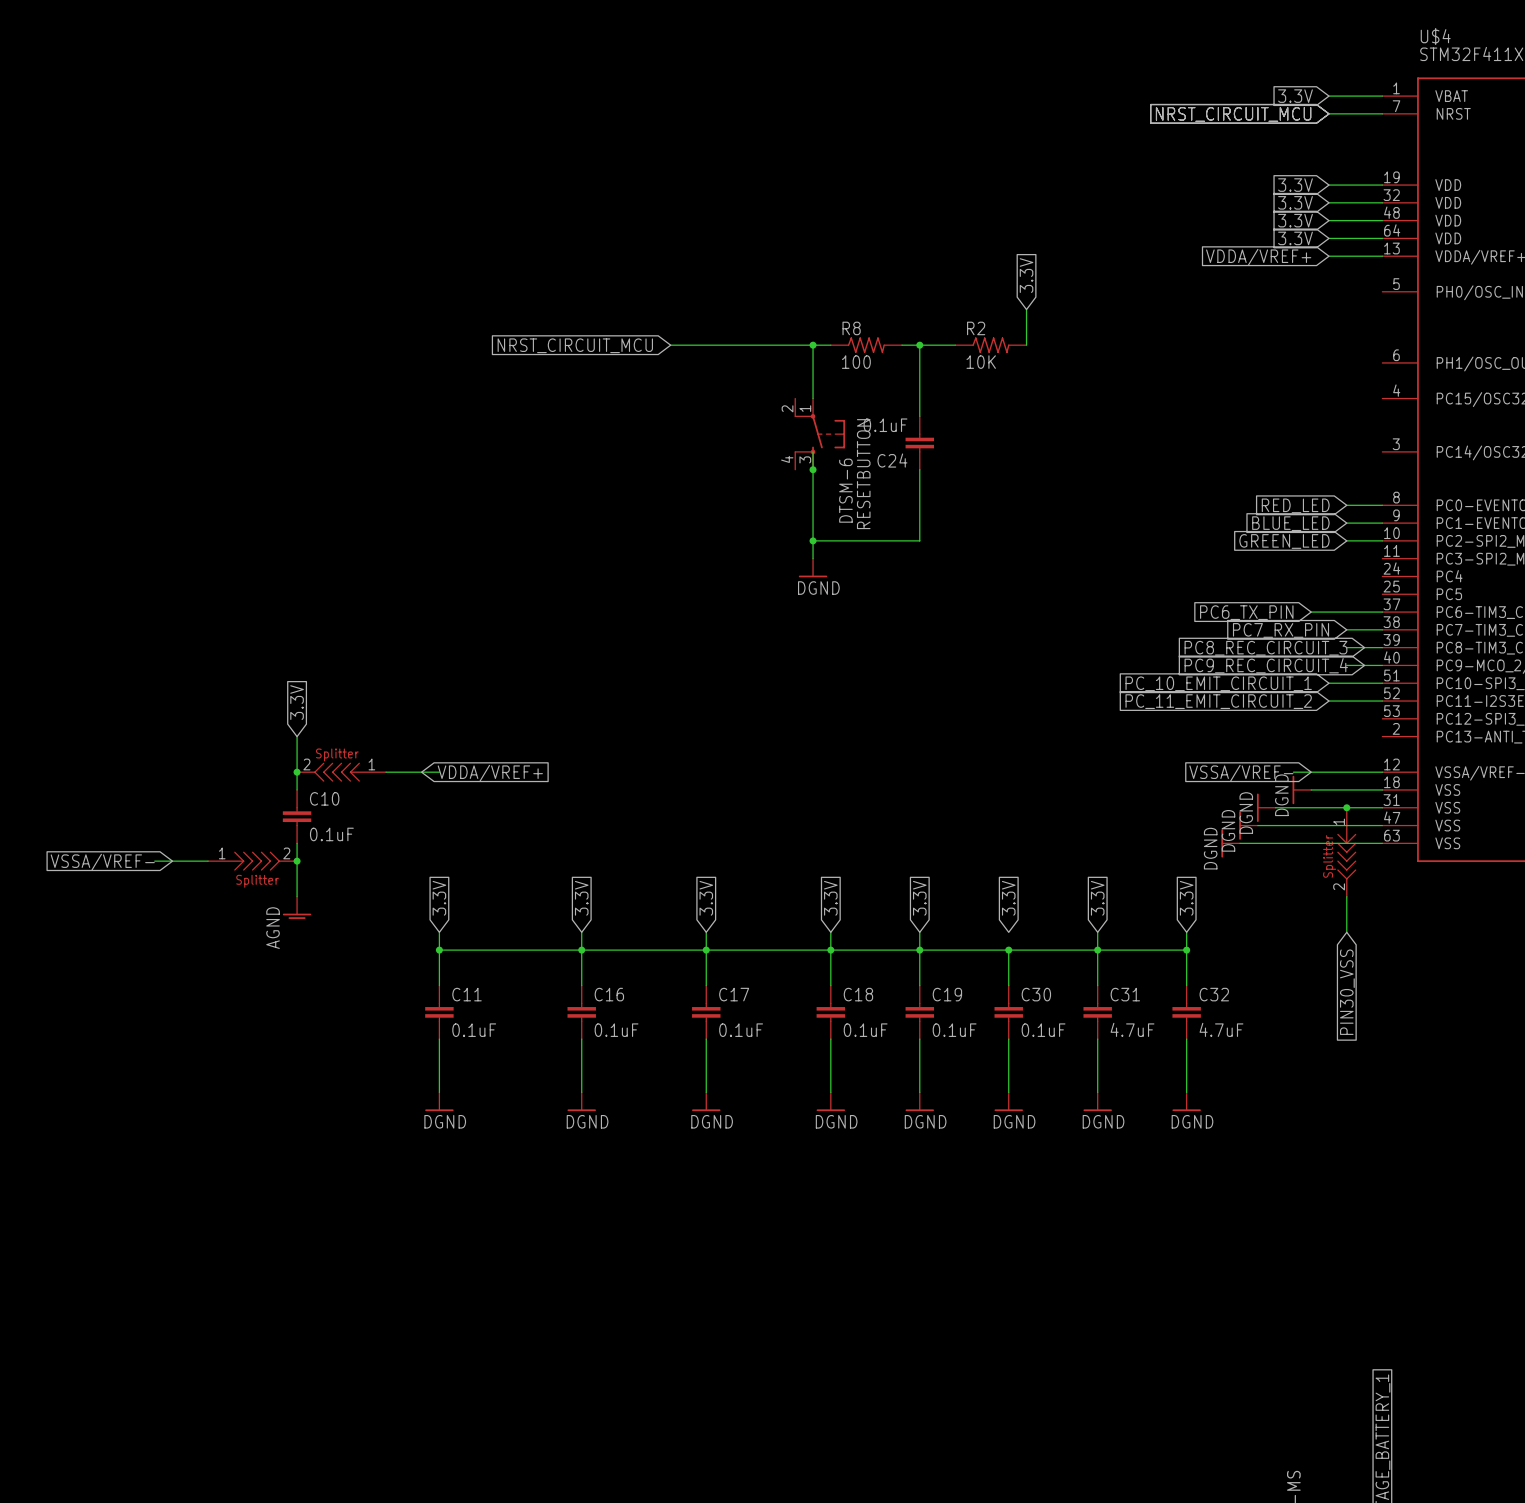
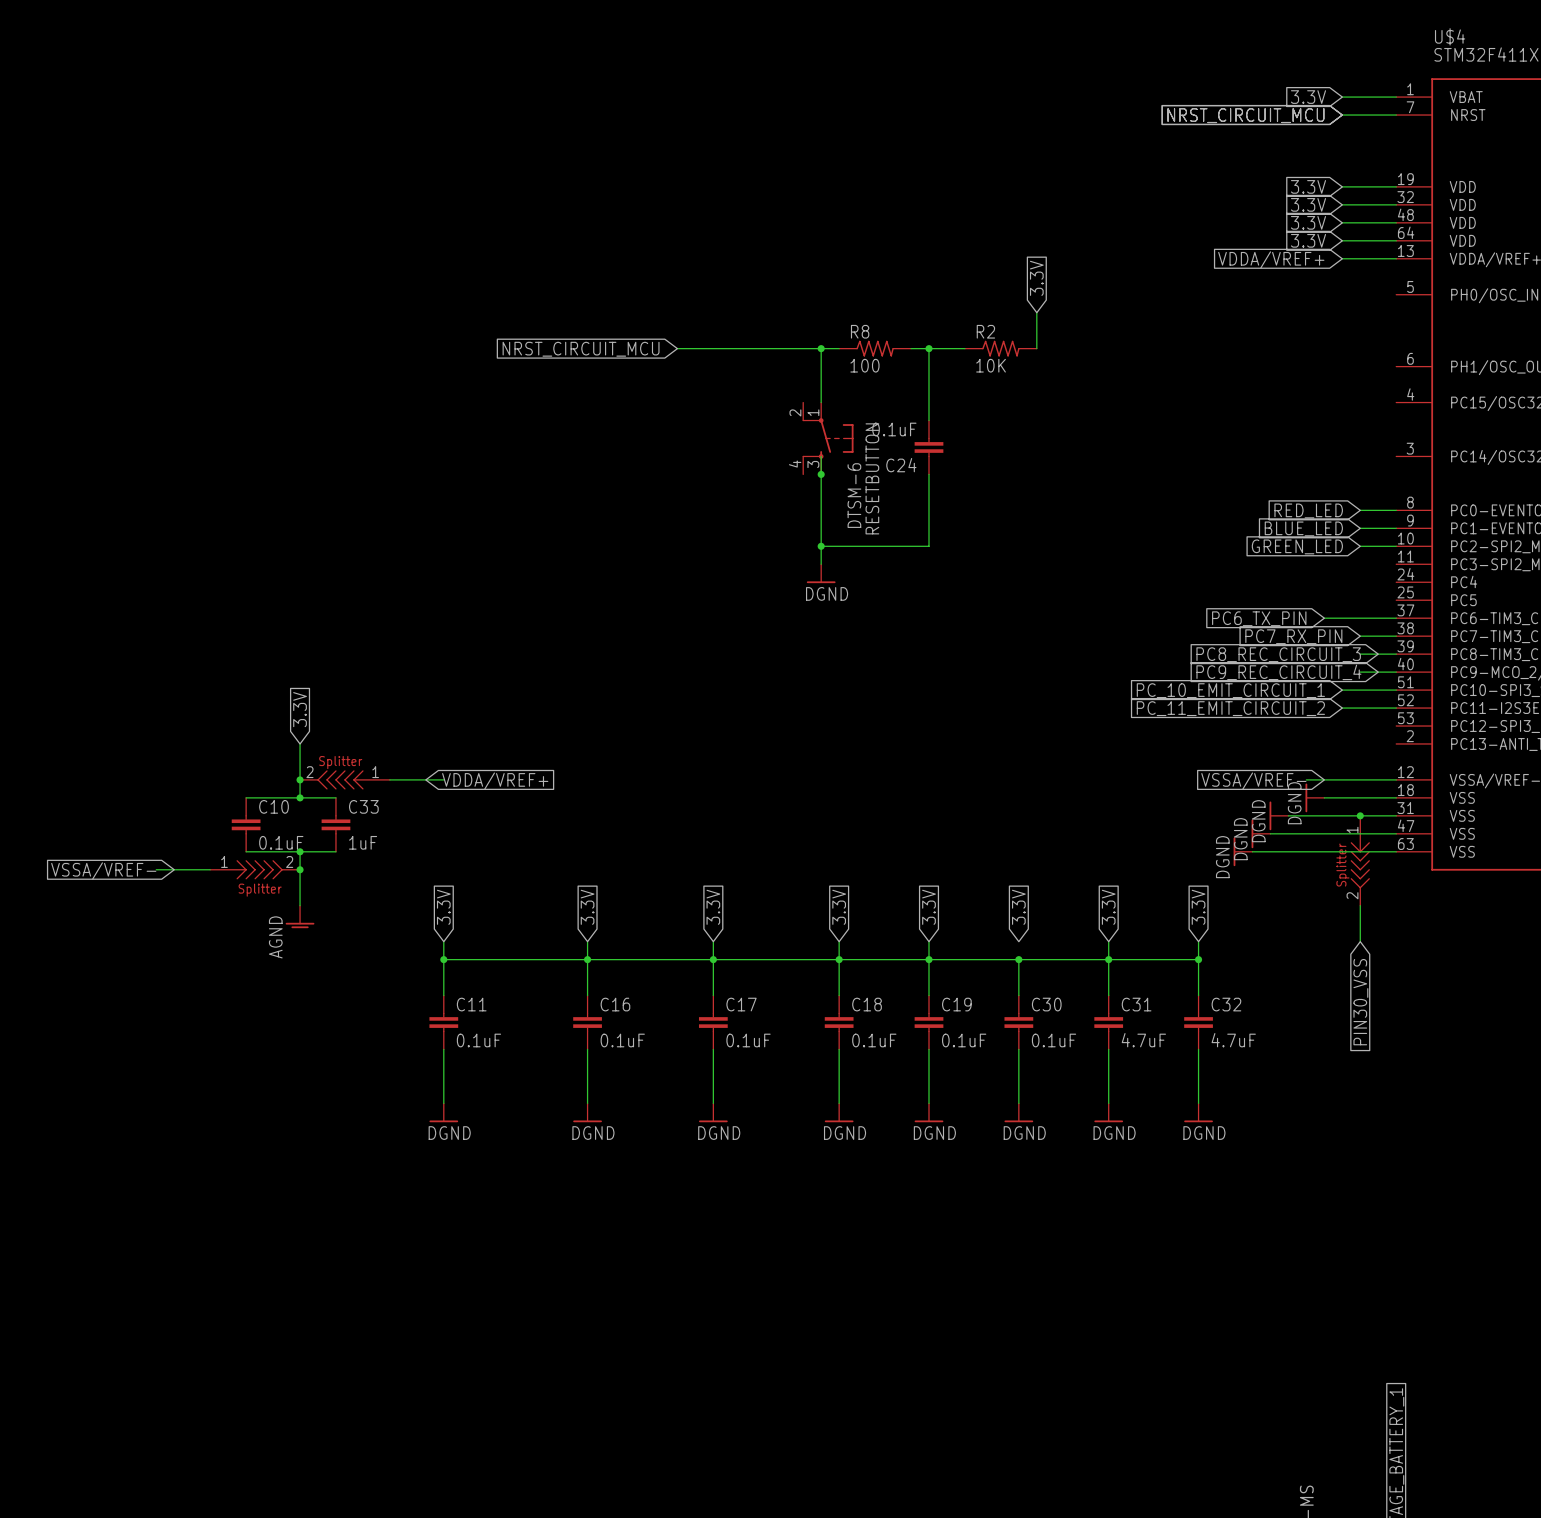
wire: none -> (246, 797) (335, 797)
junction: none -> (300, 797)
C10 position: (297, 816) -> (246, 824)
C33: none -> 1uF (335, 824)
wire: none -> (246, 851) (335, 851)
junction: none -> (300, 851)

